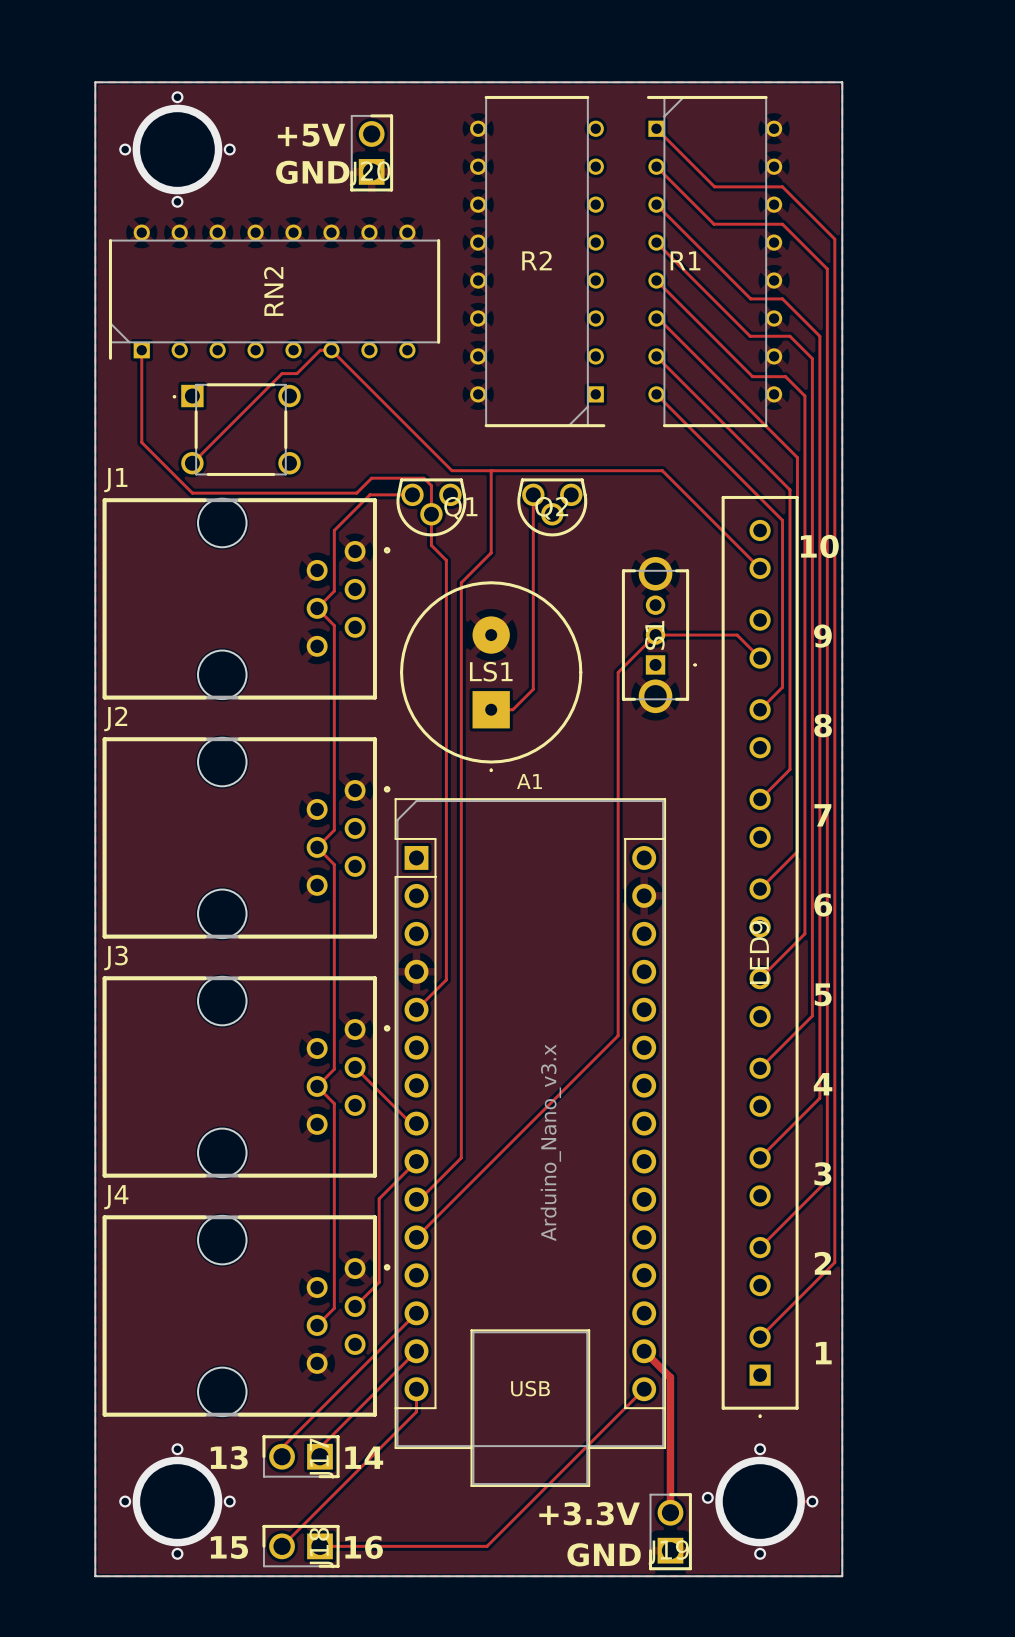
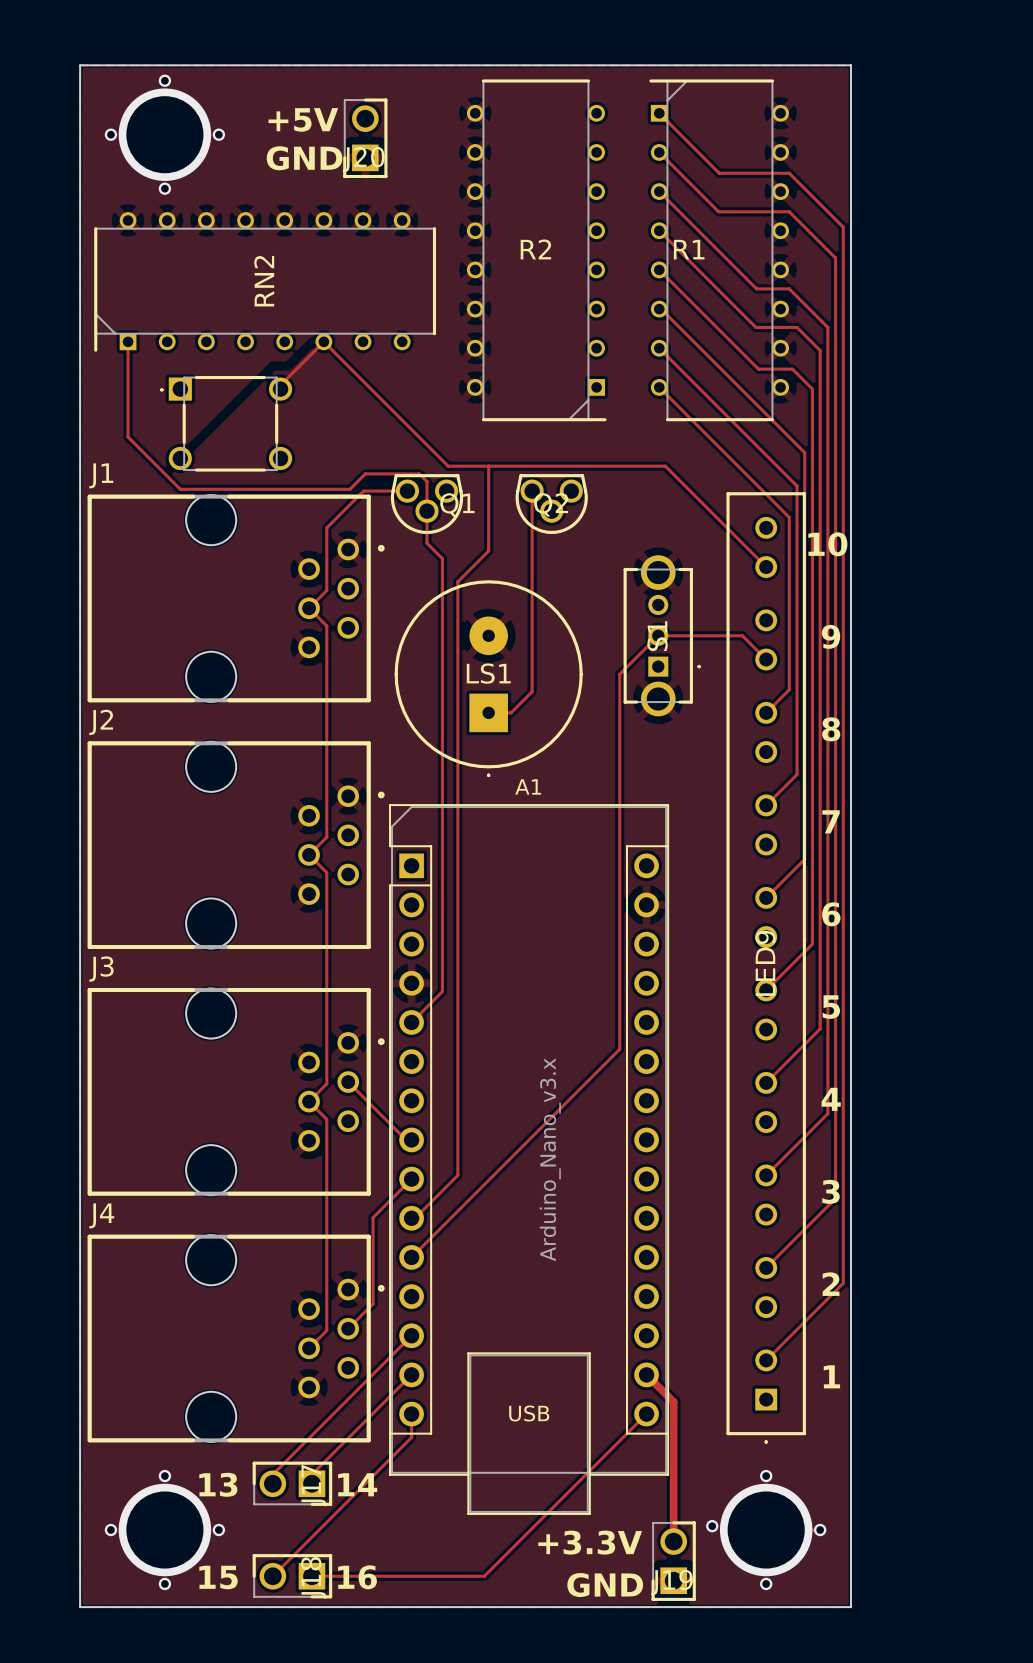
track: (331, 350) (320, 350) (296, 373) (282, 373) (192, 463) -> (323, 341) (280, 385) (280, 389)

